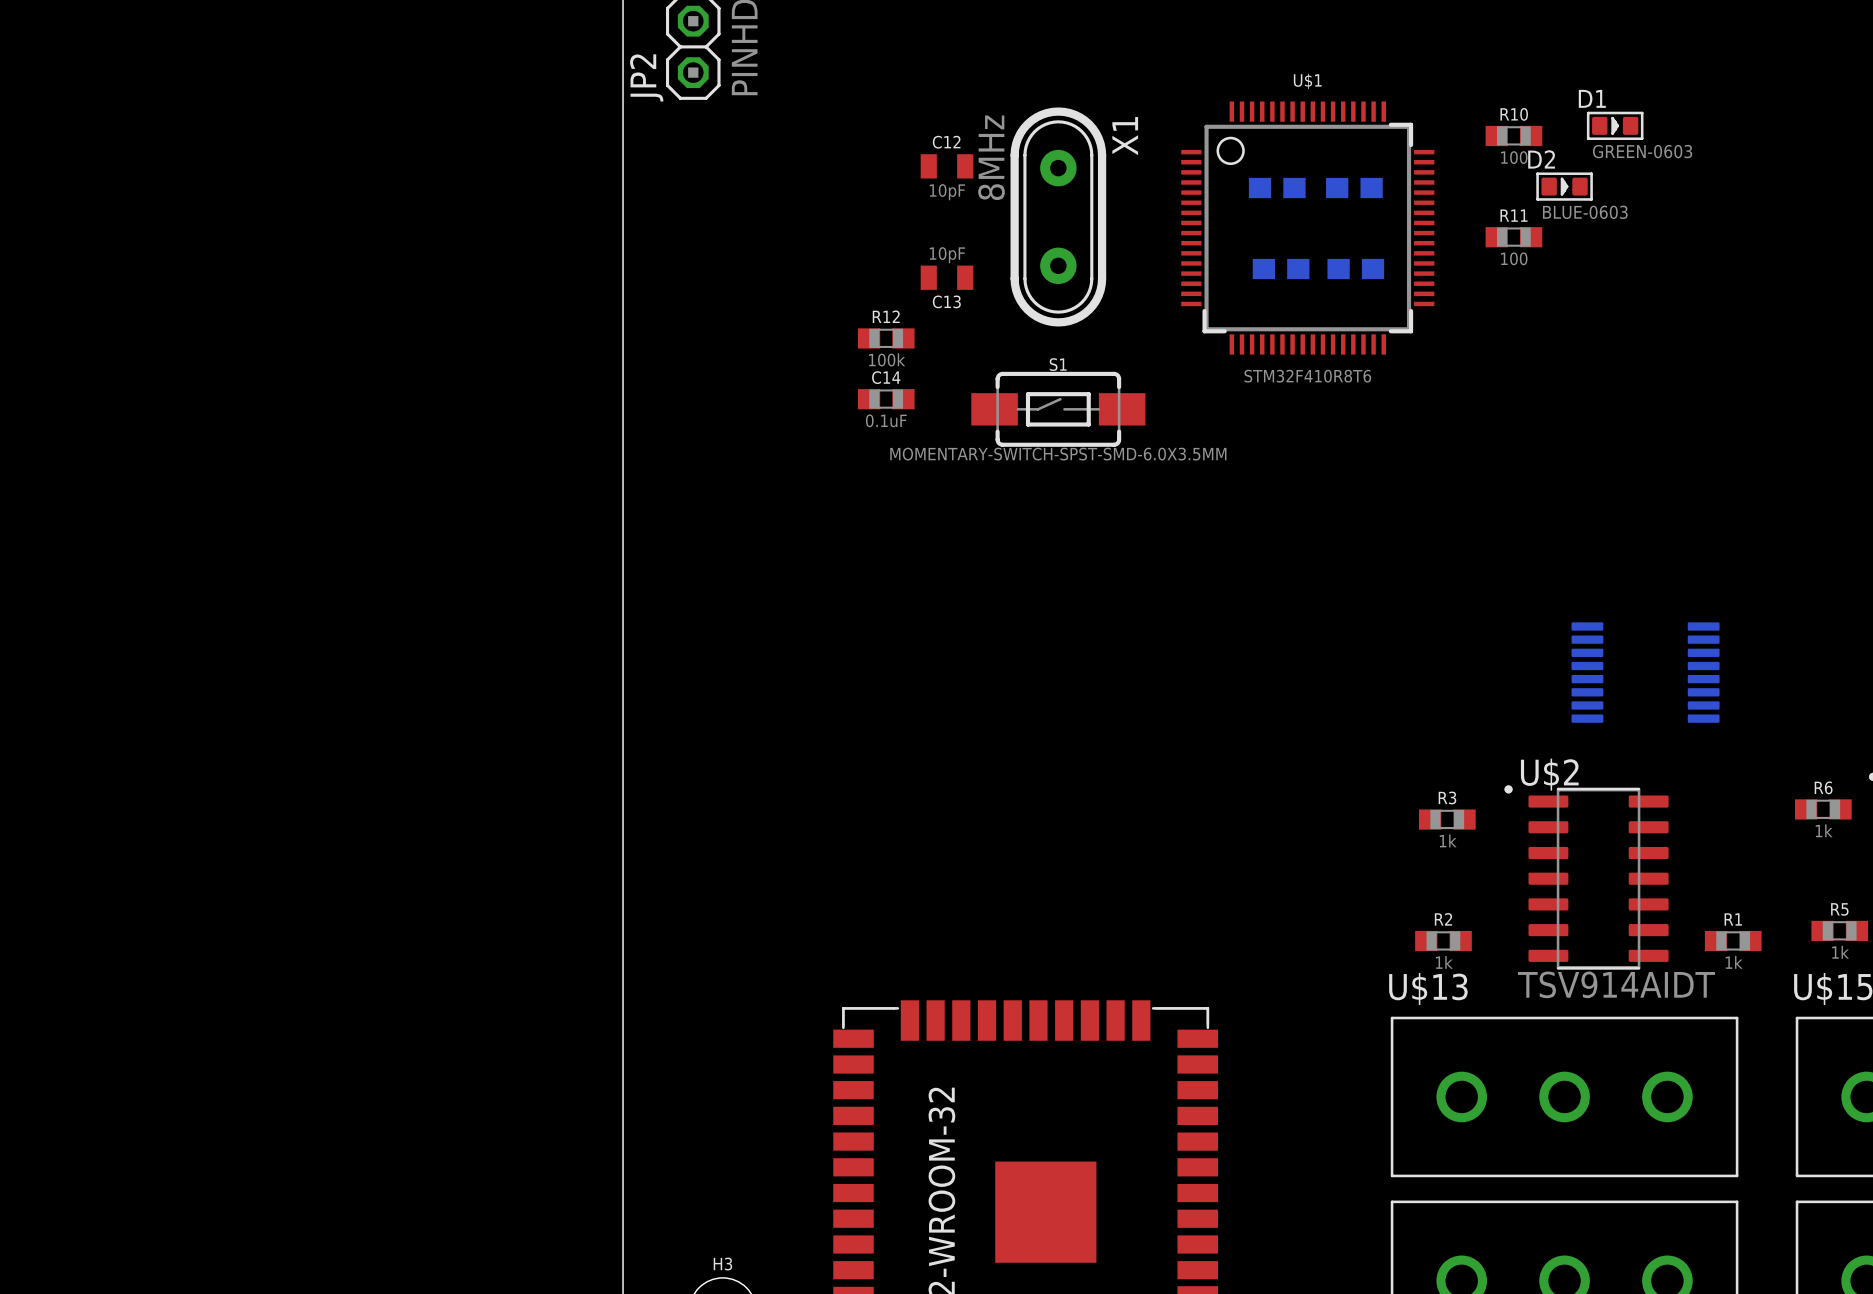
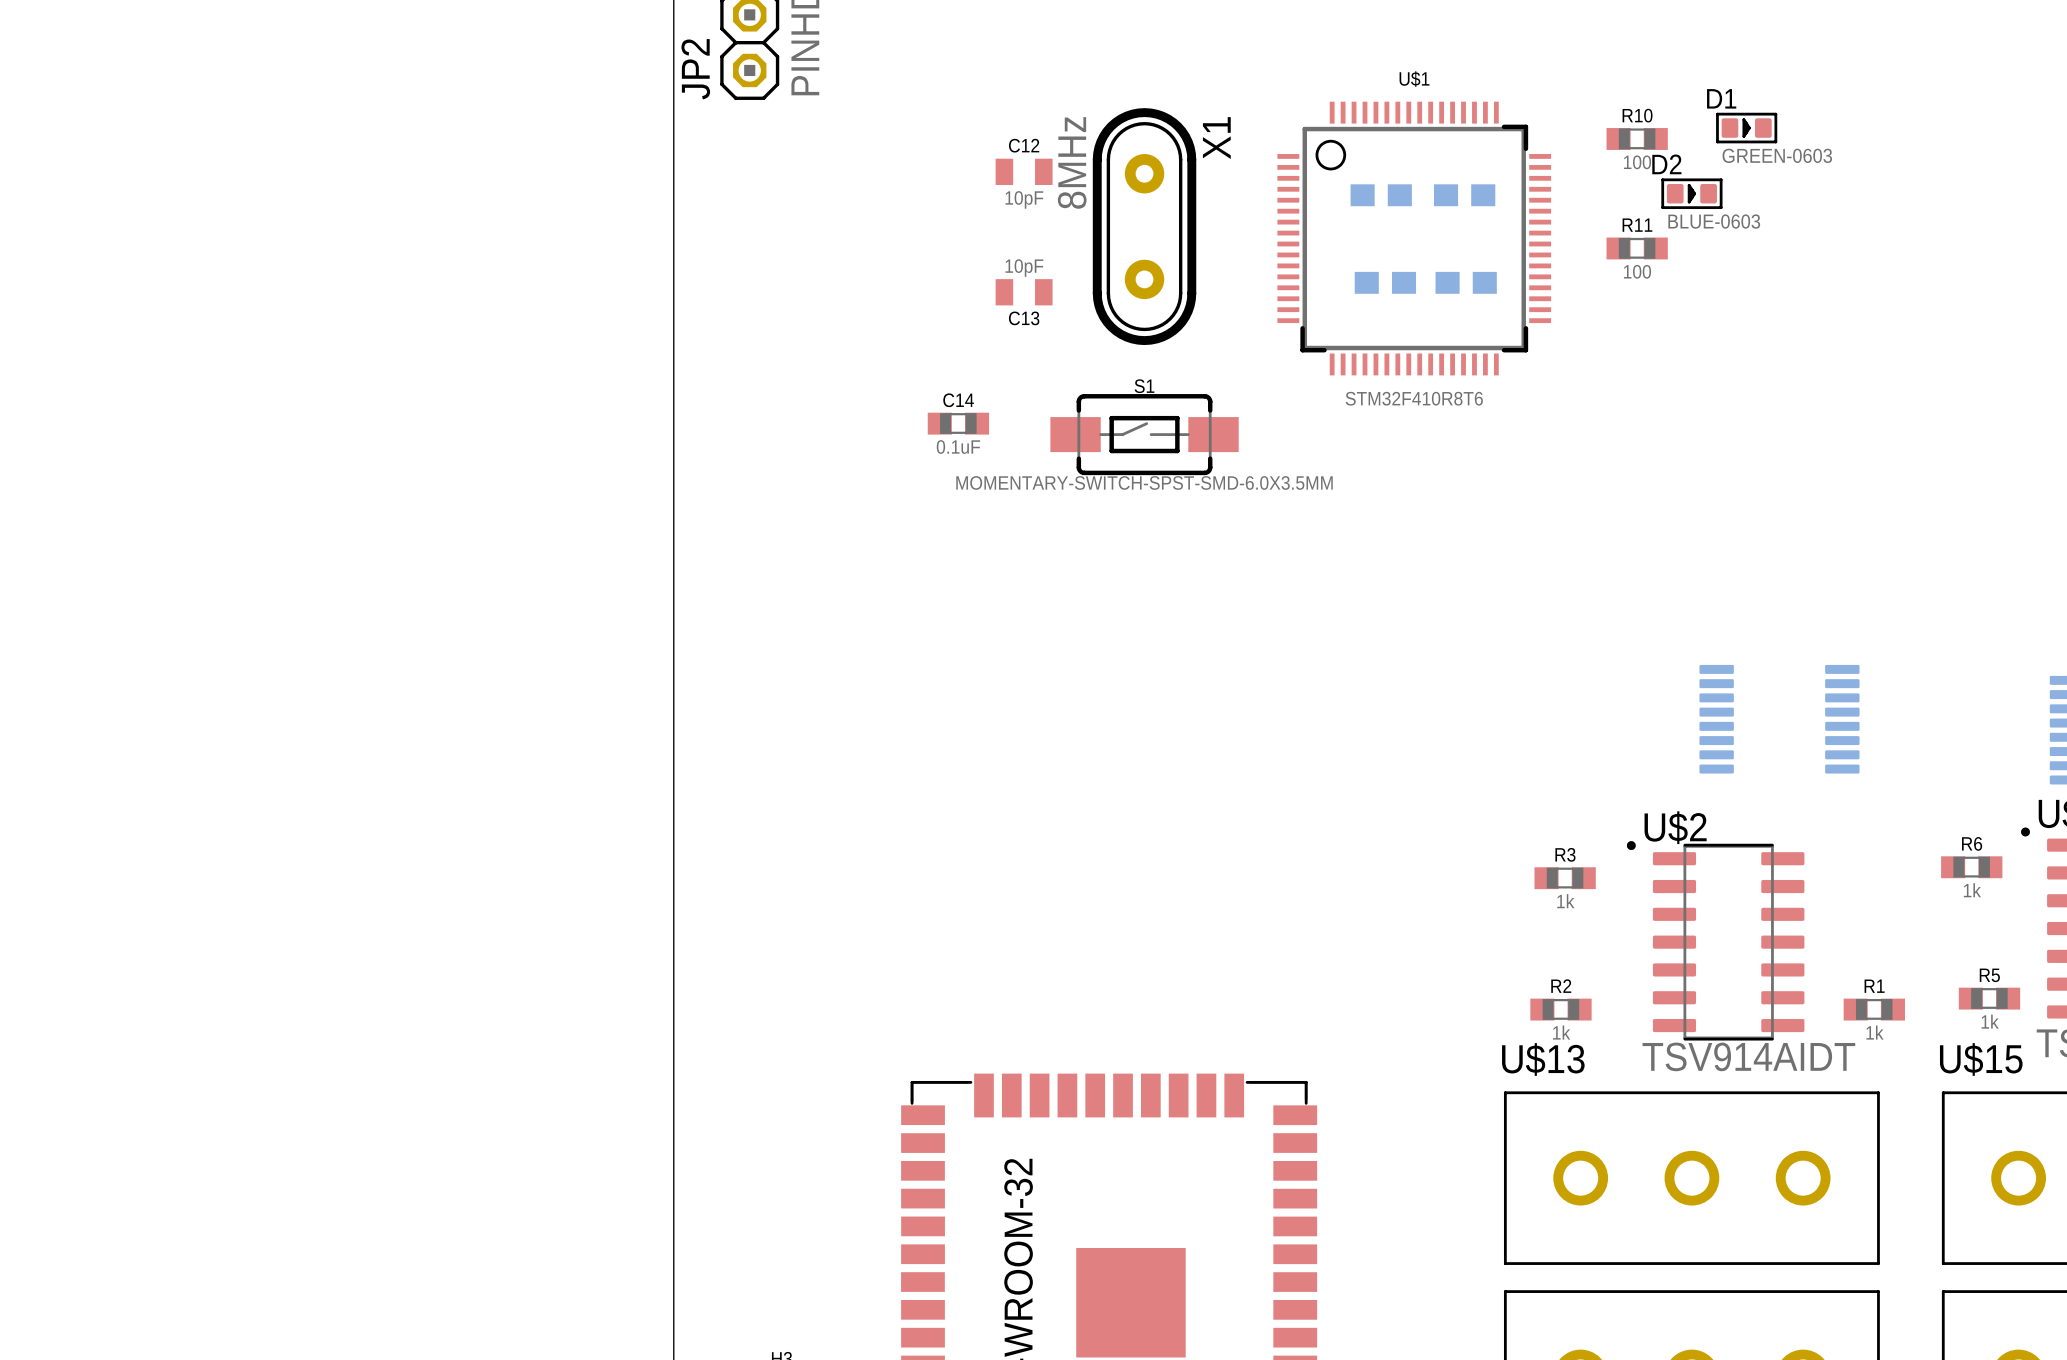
R12: 100k (886, 338) -> none

